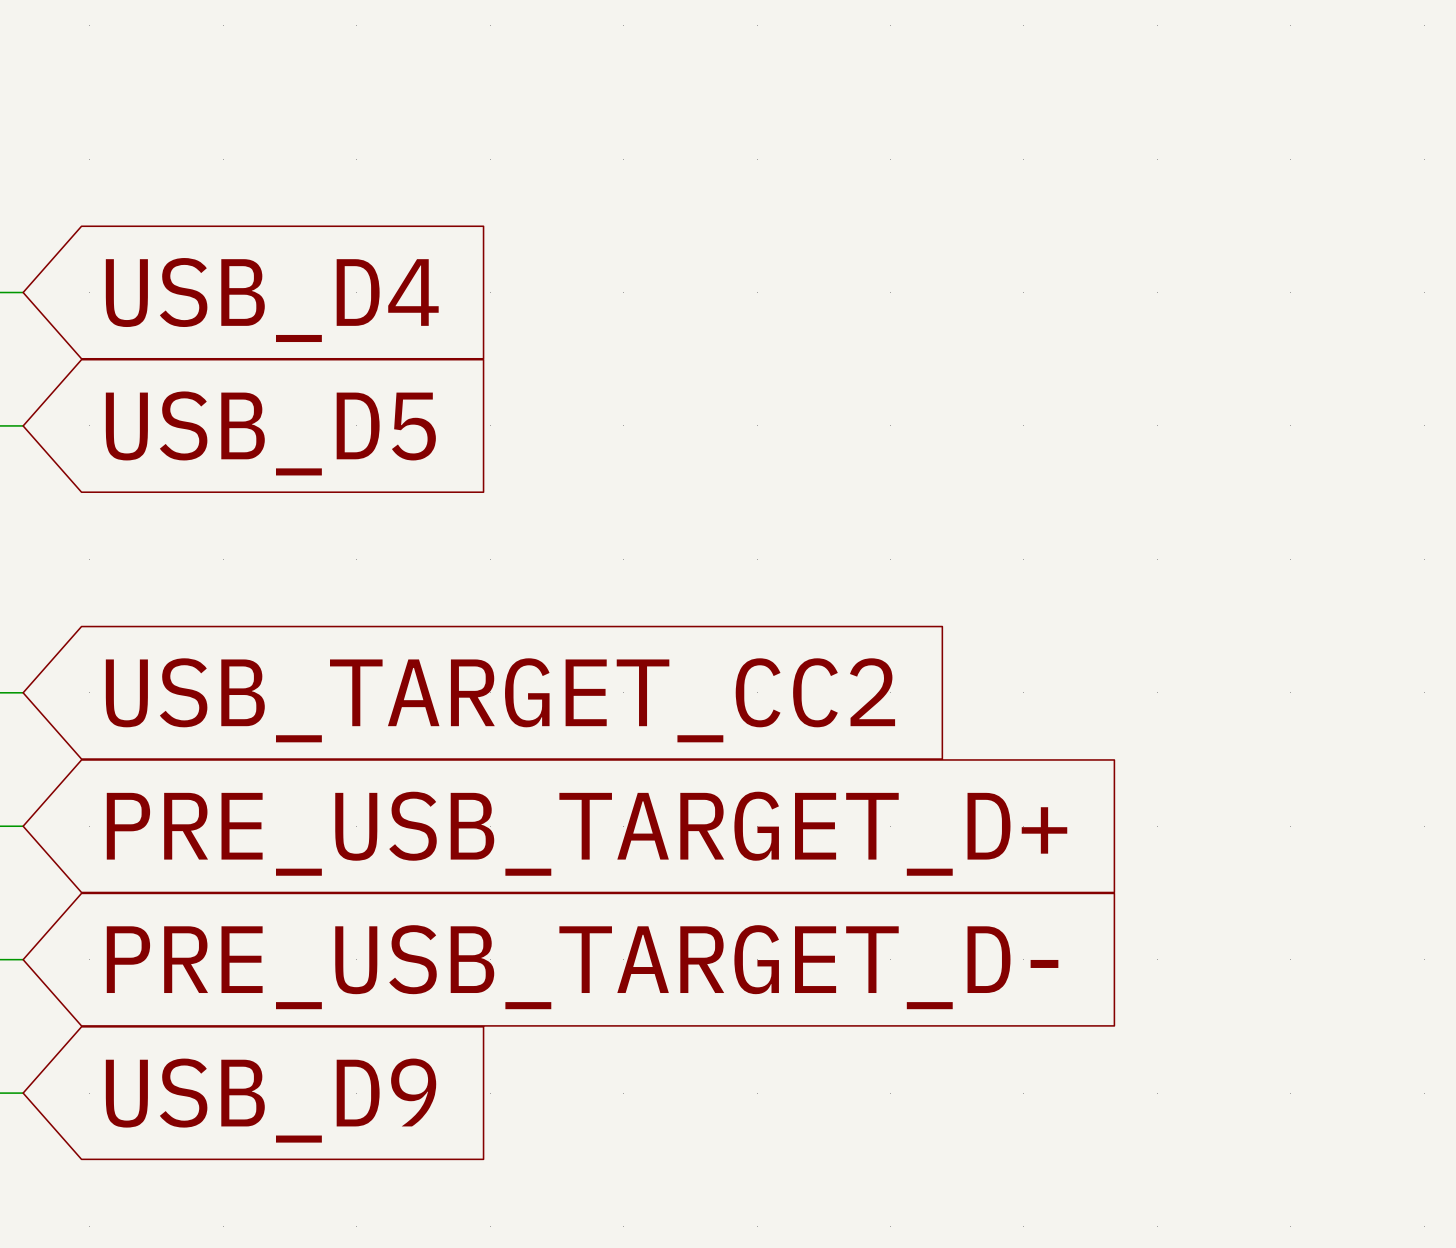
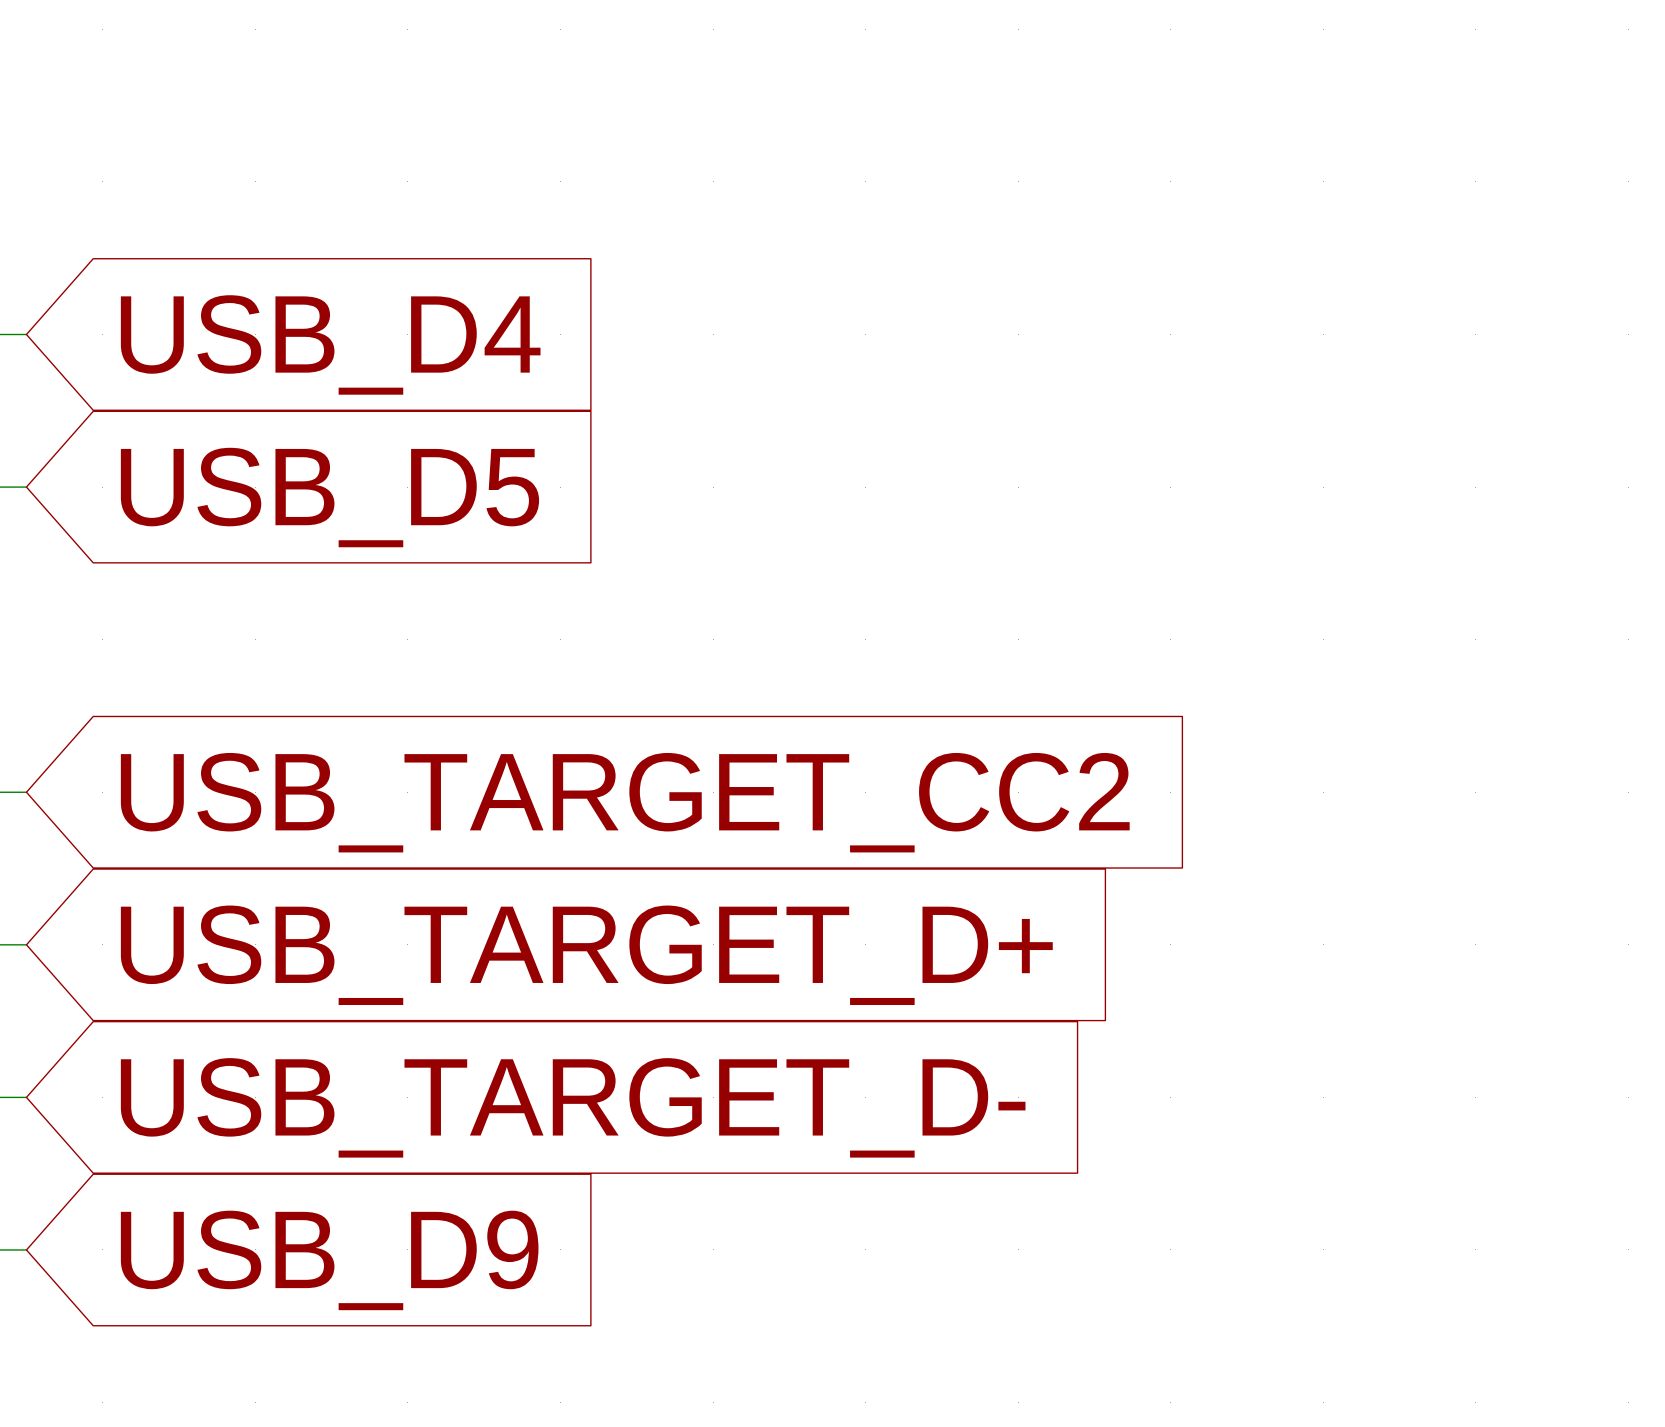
global label: PRE_USB_TARGET_D+ (587, 833) -> USB_TARGET_D+ (586, 955)
global label: PRE_USB_TARGET_D- (582, 967) -> USB_TARGET_D- (573, 1107)

